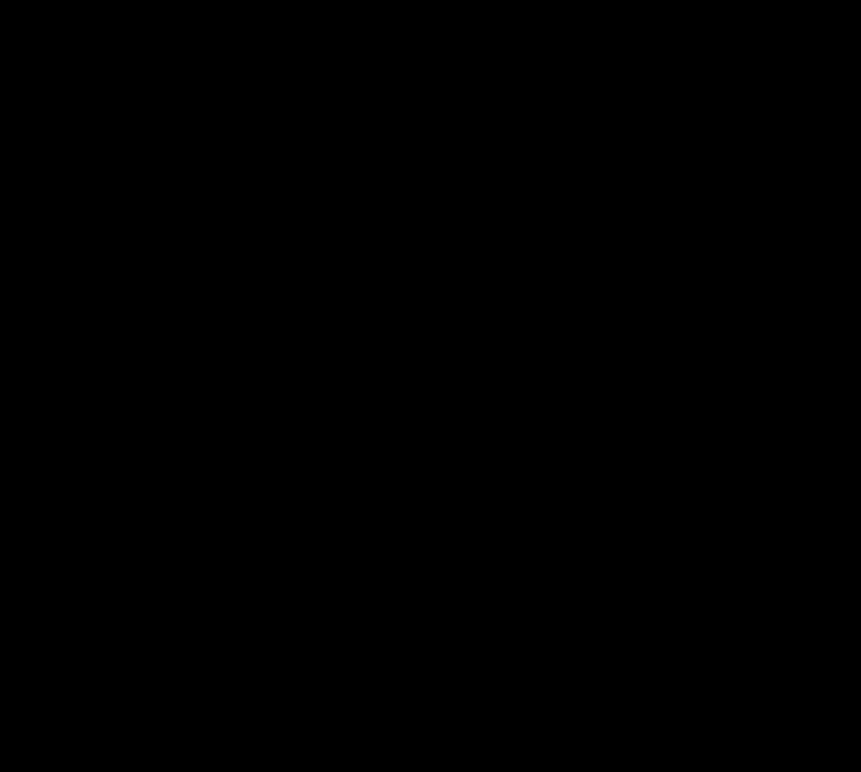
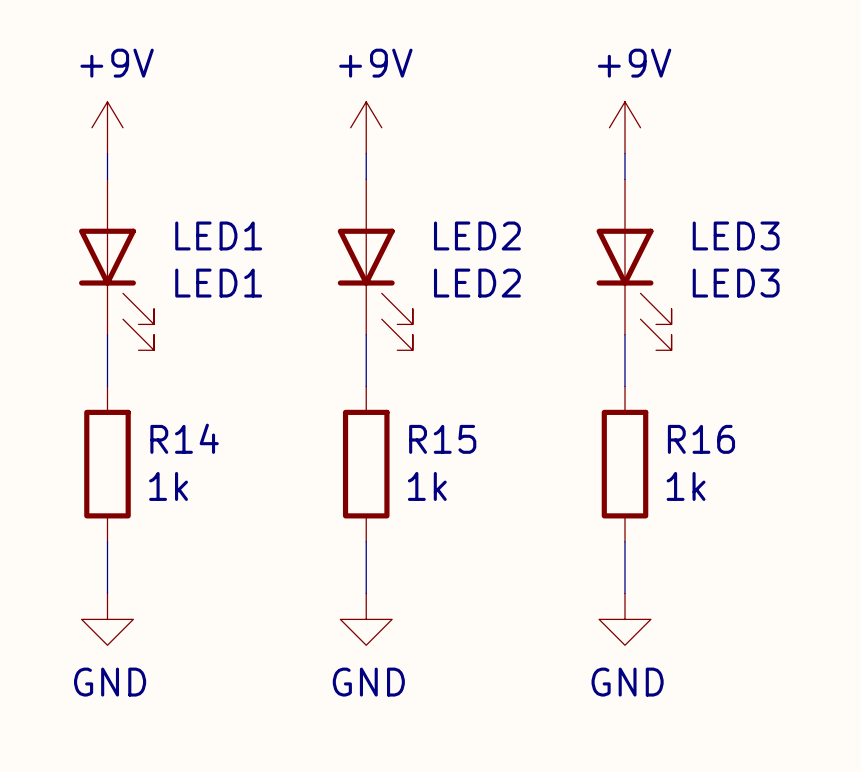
power symbol: none -> +9V (107, 127)
power symbol: none -> +9V (366, 127)
power symbol: none -> +9V (624, 127)
wire: none -> (107, 153) (107, 179)
wire: none -> (366, 153) (366, 179)
wire: none -> (624, 153) (624, 179)
LED1: none -> LED1 (116, 264)
LED2: none -> LED2 (375, 264)
LED3: none -> LED3 (634, 264)
wire: none -> (107, 334) (107, 386)
wire: none -> (366, 334) (366, 386)
wire: none -> (624, 334) (624, 386)
R14: none -> 1k (107, 464)
R15: none -> 1k (366, 464)
R16: none -> 1k (624, 464)
wire: none -> (107, 541) (107, 593)
wire: none -> (366, 541) (366, 593)
wire: none -> (624, 541) (624, 593)
power symbol: none -> GND (107, 619)
power symbol: none -> GND (366, 619)
power symbol: none -> GND (624, 619)

